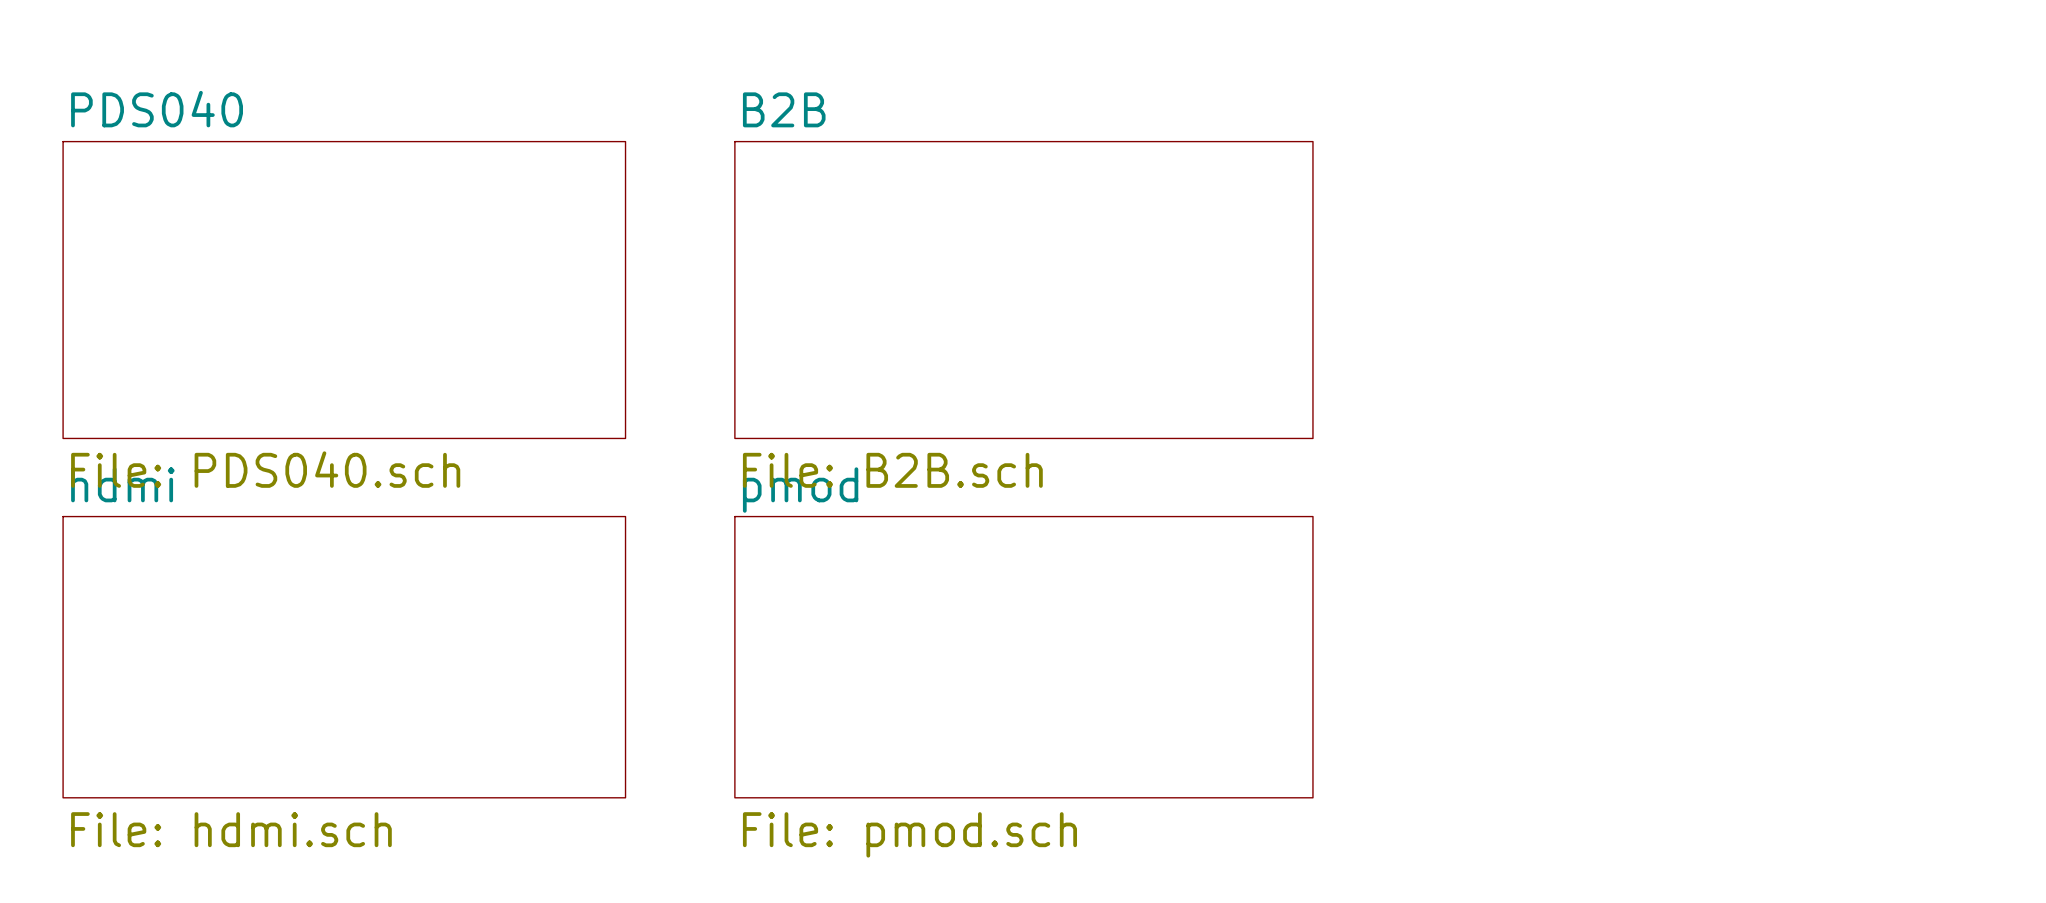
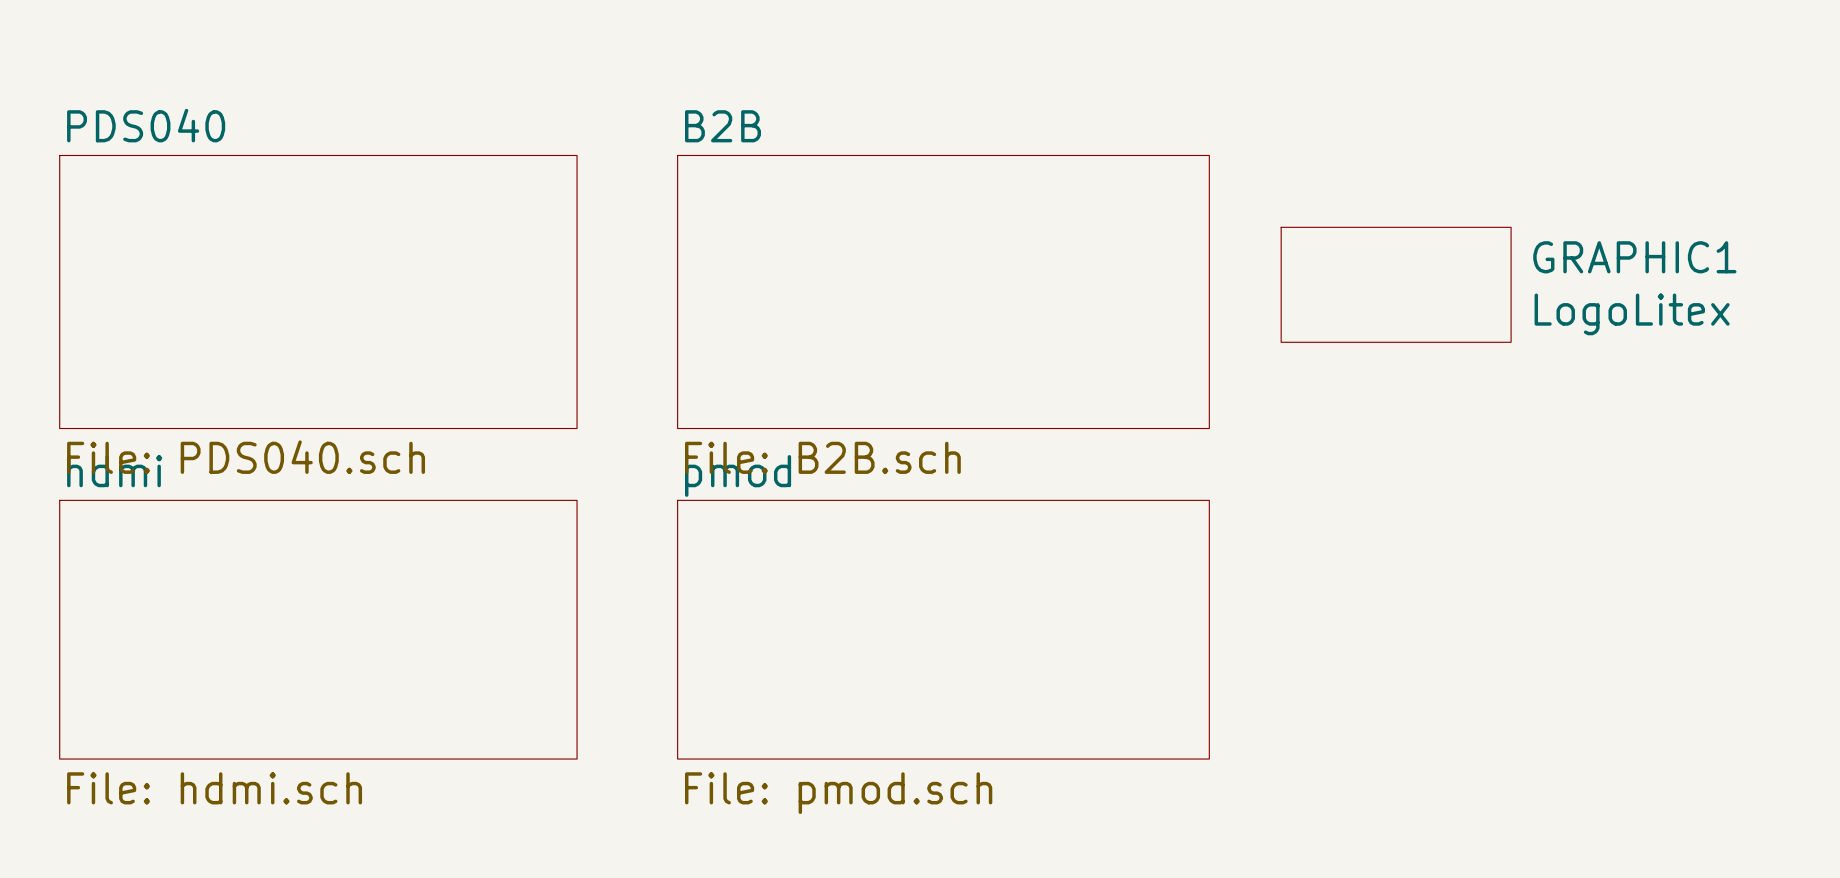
GRAPHIC1: none -> LogoLitex (1396, 284)

